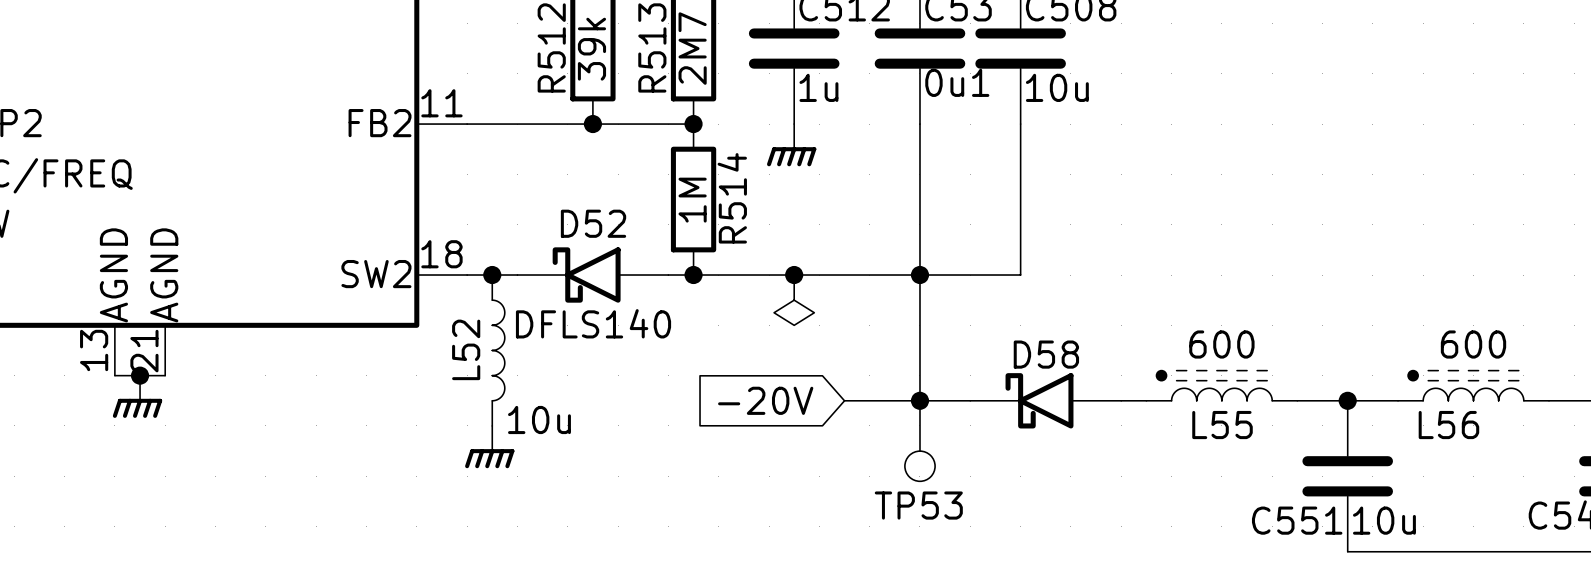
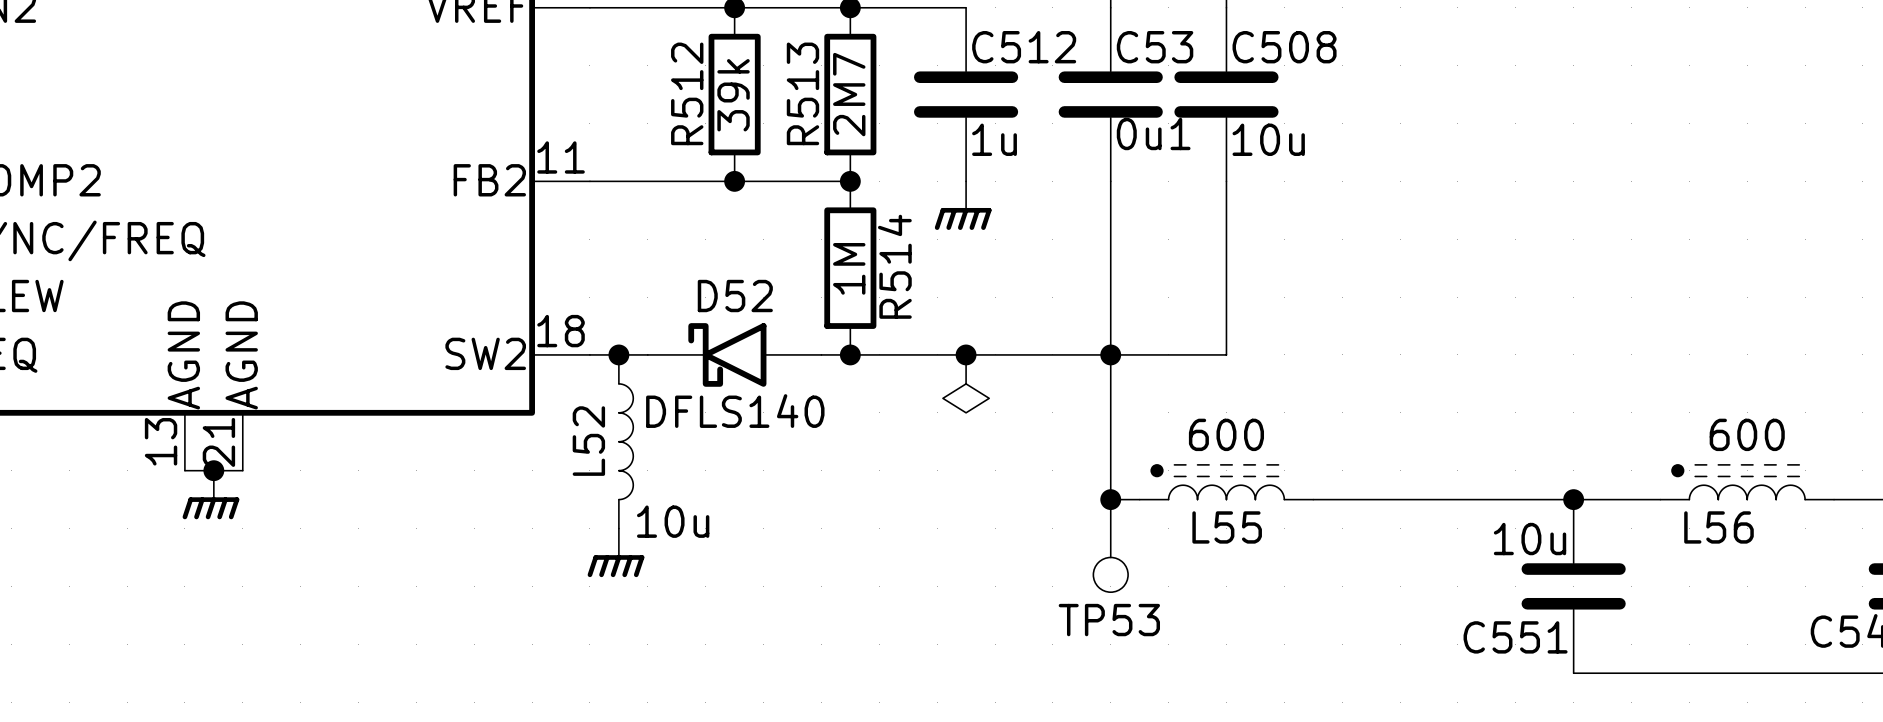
L55 position: (1221, 385) -> (1226, 482)
global label: -20V (765, 400) -> none
wire: (844, 400) (919, 400) -> none
D58: (1045, 400) -> none
wire: none -> (1371, 499) (1544, 499)
junction position: (1347, 400) -> (1573, 499)
C551 position: (1347, 476) -> (1573, 586)
C551 value position: 10u (1384, 520) -> 10u (1530, 539)
wire: none -> (1573, 673) (1602, 673)

